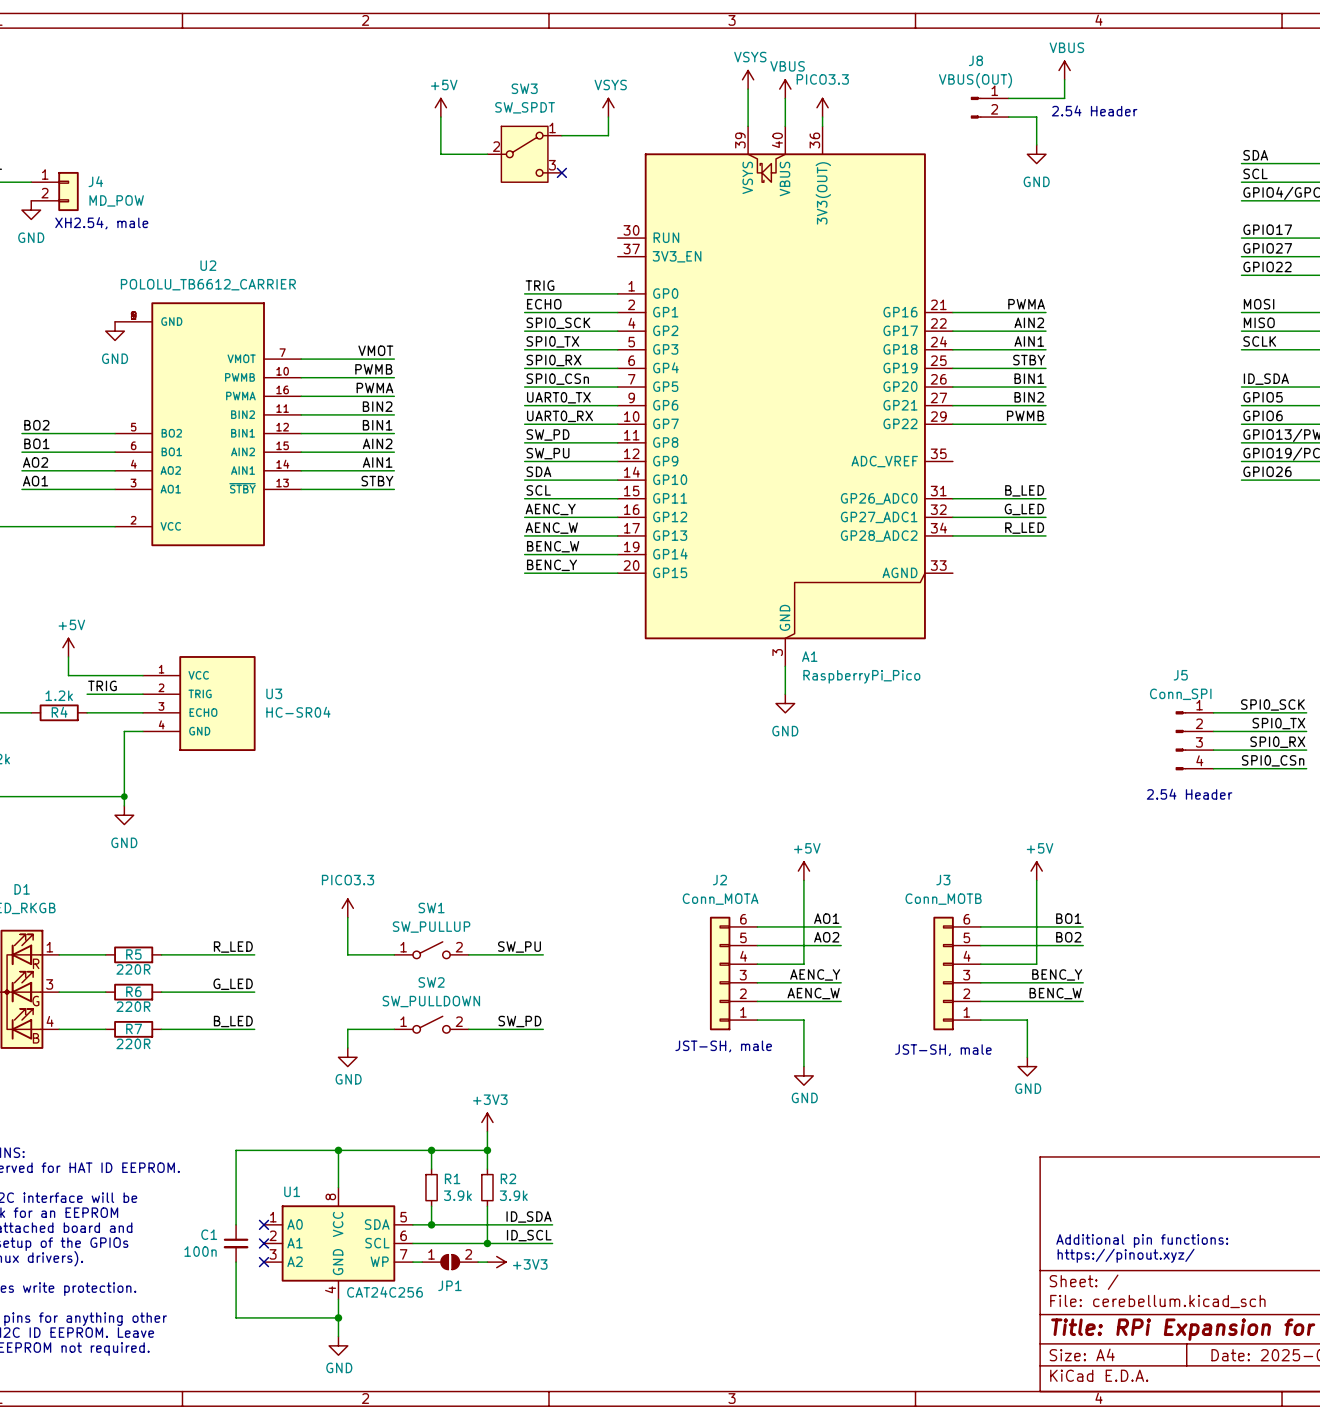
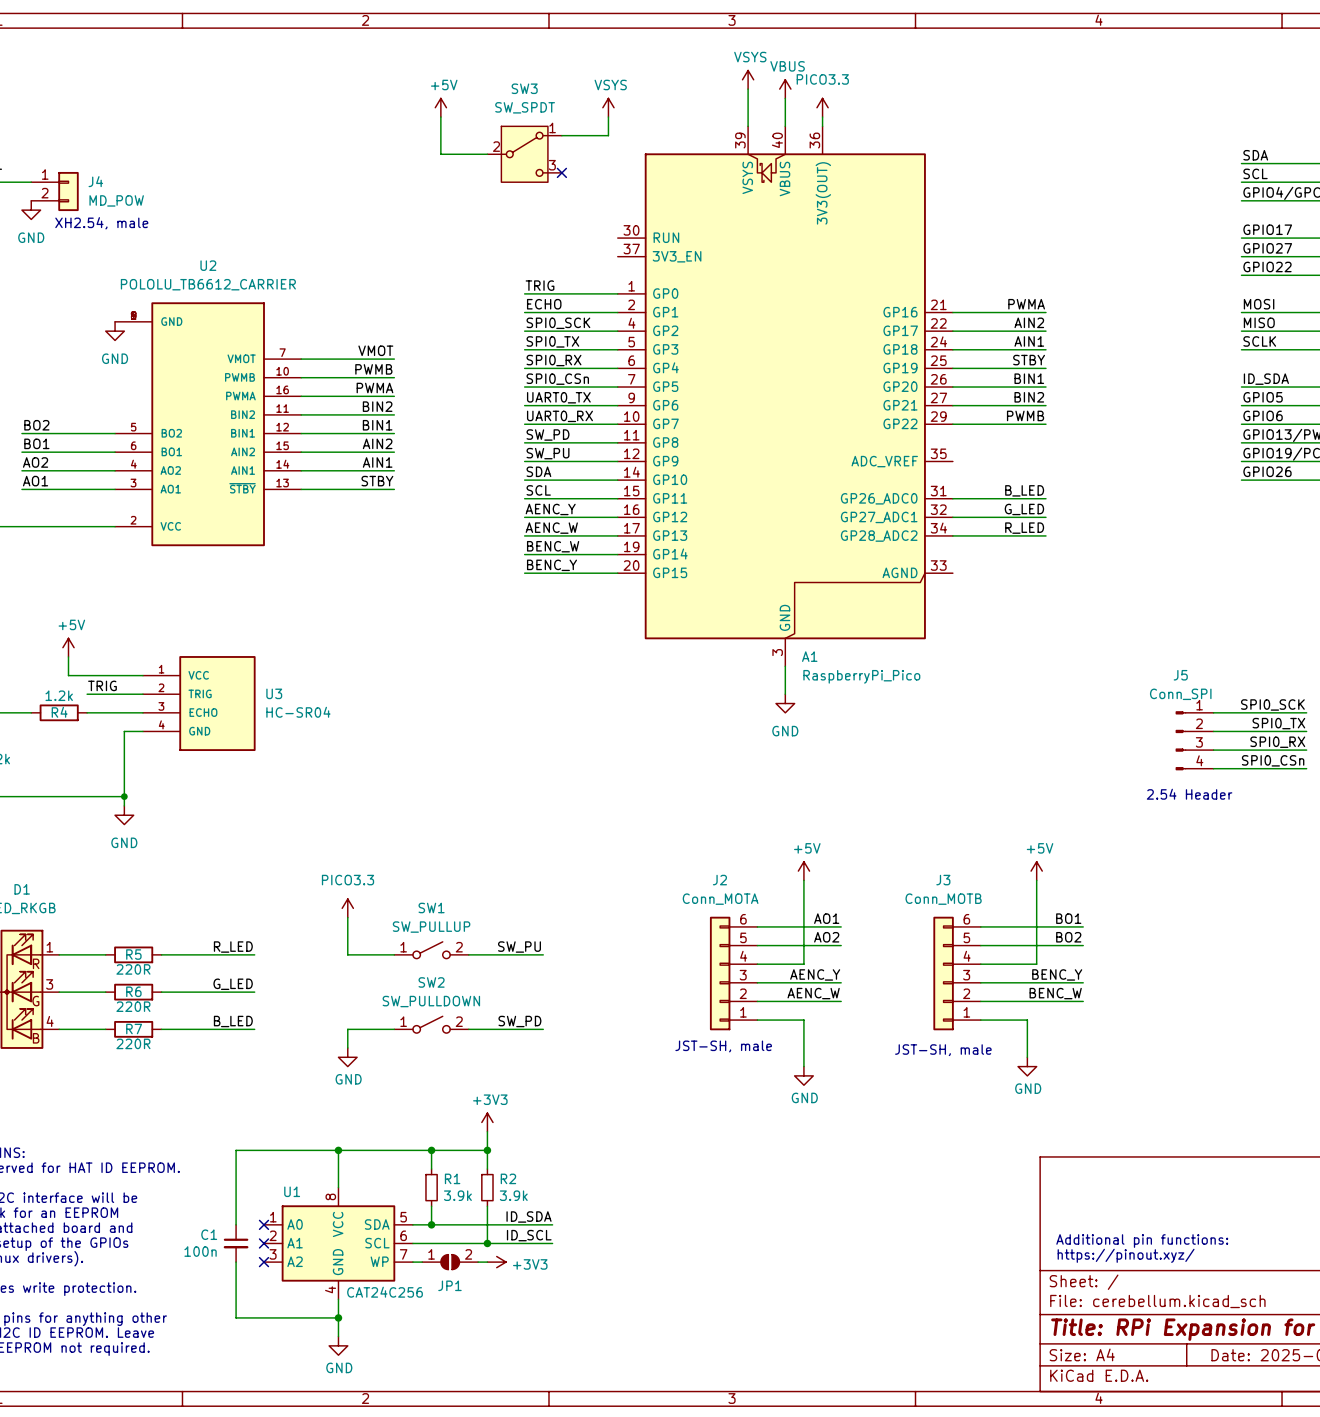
power symbol: VBUS (1064, 70) -> none
wire: (1064, 79) (1064, 98) (1008, 98) -> none
J8: VBUS(OUT) (989, 107) -> none
text: 2.54 Header (1094, 110) -> none
wire: (1008, 117) (1036, 117) (1036, 144) -> none
power symbol: GND (1036, 154) -> none

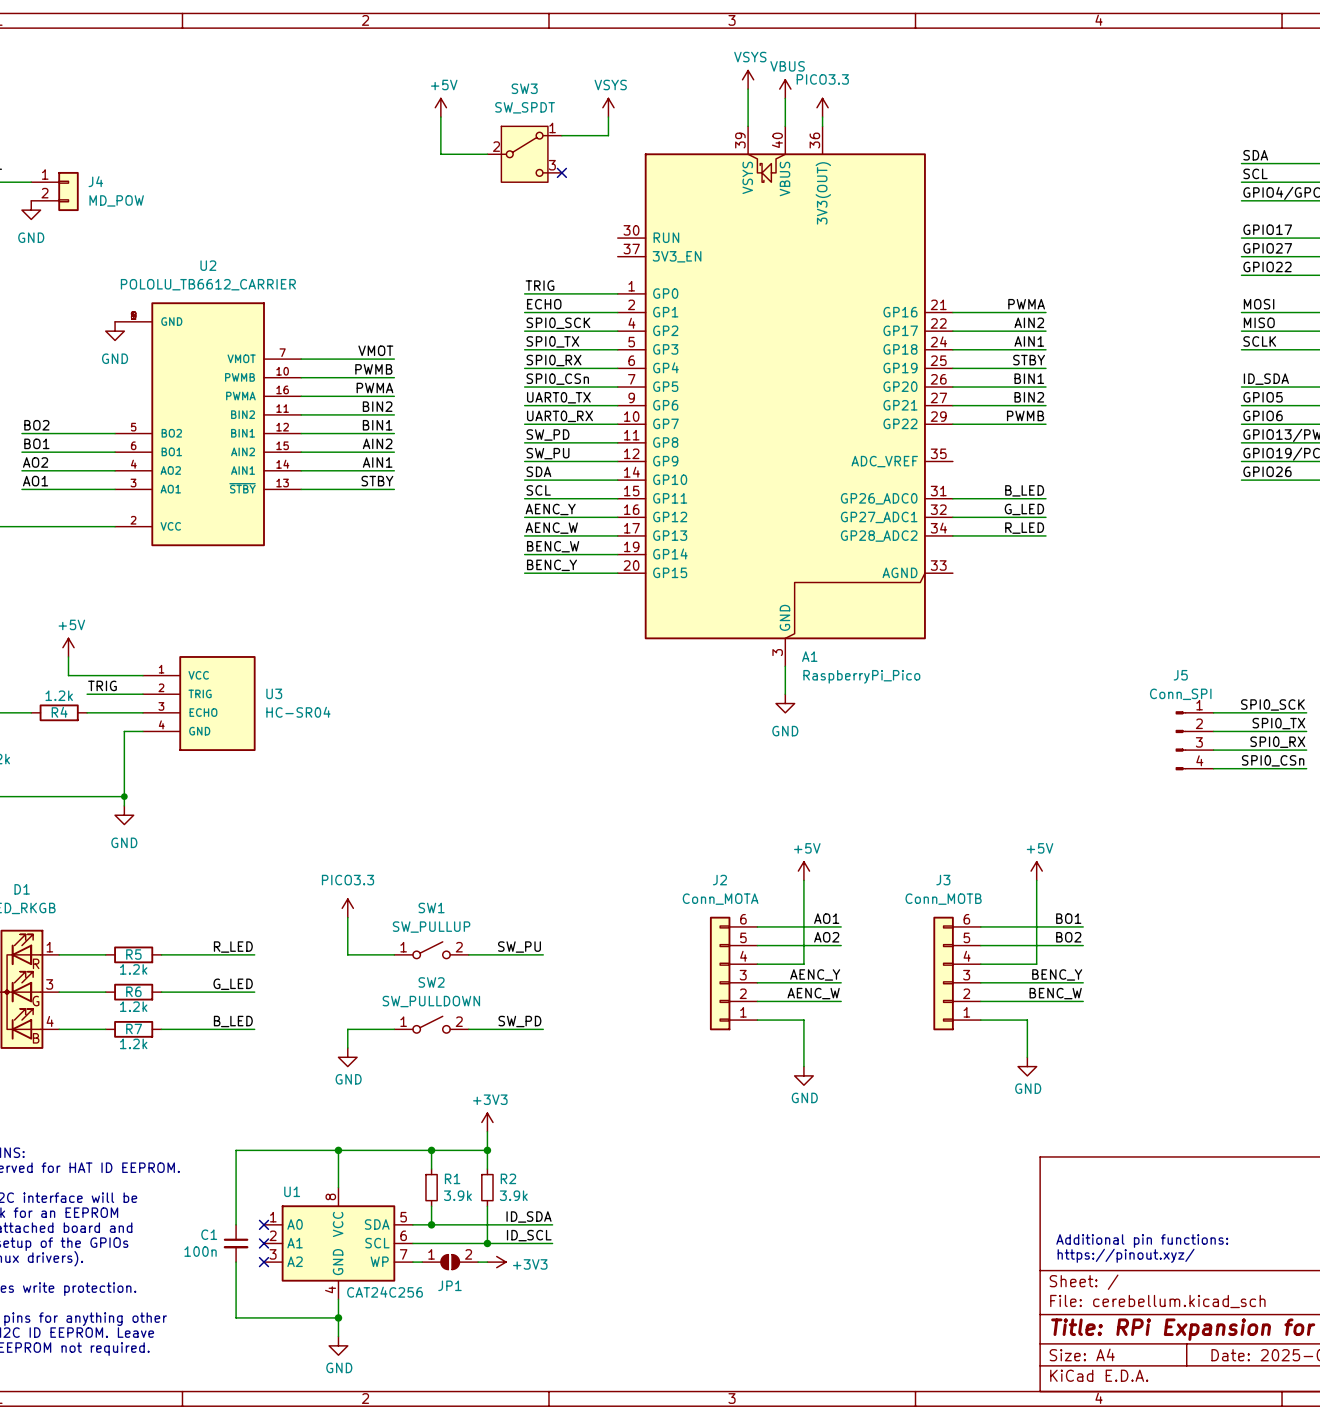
text: XH2.54, male (101, 223) -> none
text: 2.54 Header (1189, 794) -> none
R5 value: 220R (133, 969) -> 1.2k (133, 969)
R6 value: 220R (133, 1006) -> 1.2k (133, 1006)
R7 value: 220R (133, 1043) -> 1.2k (133, 1043)
text: JST-SH, male (723, 1046) -> none
text: JST-SH, male (943, 1050) -> none

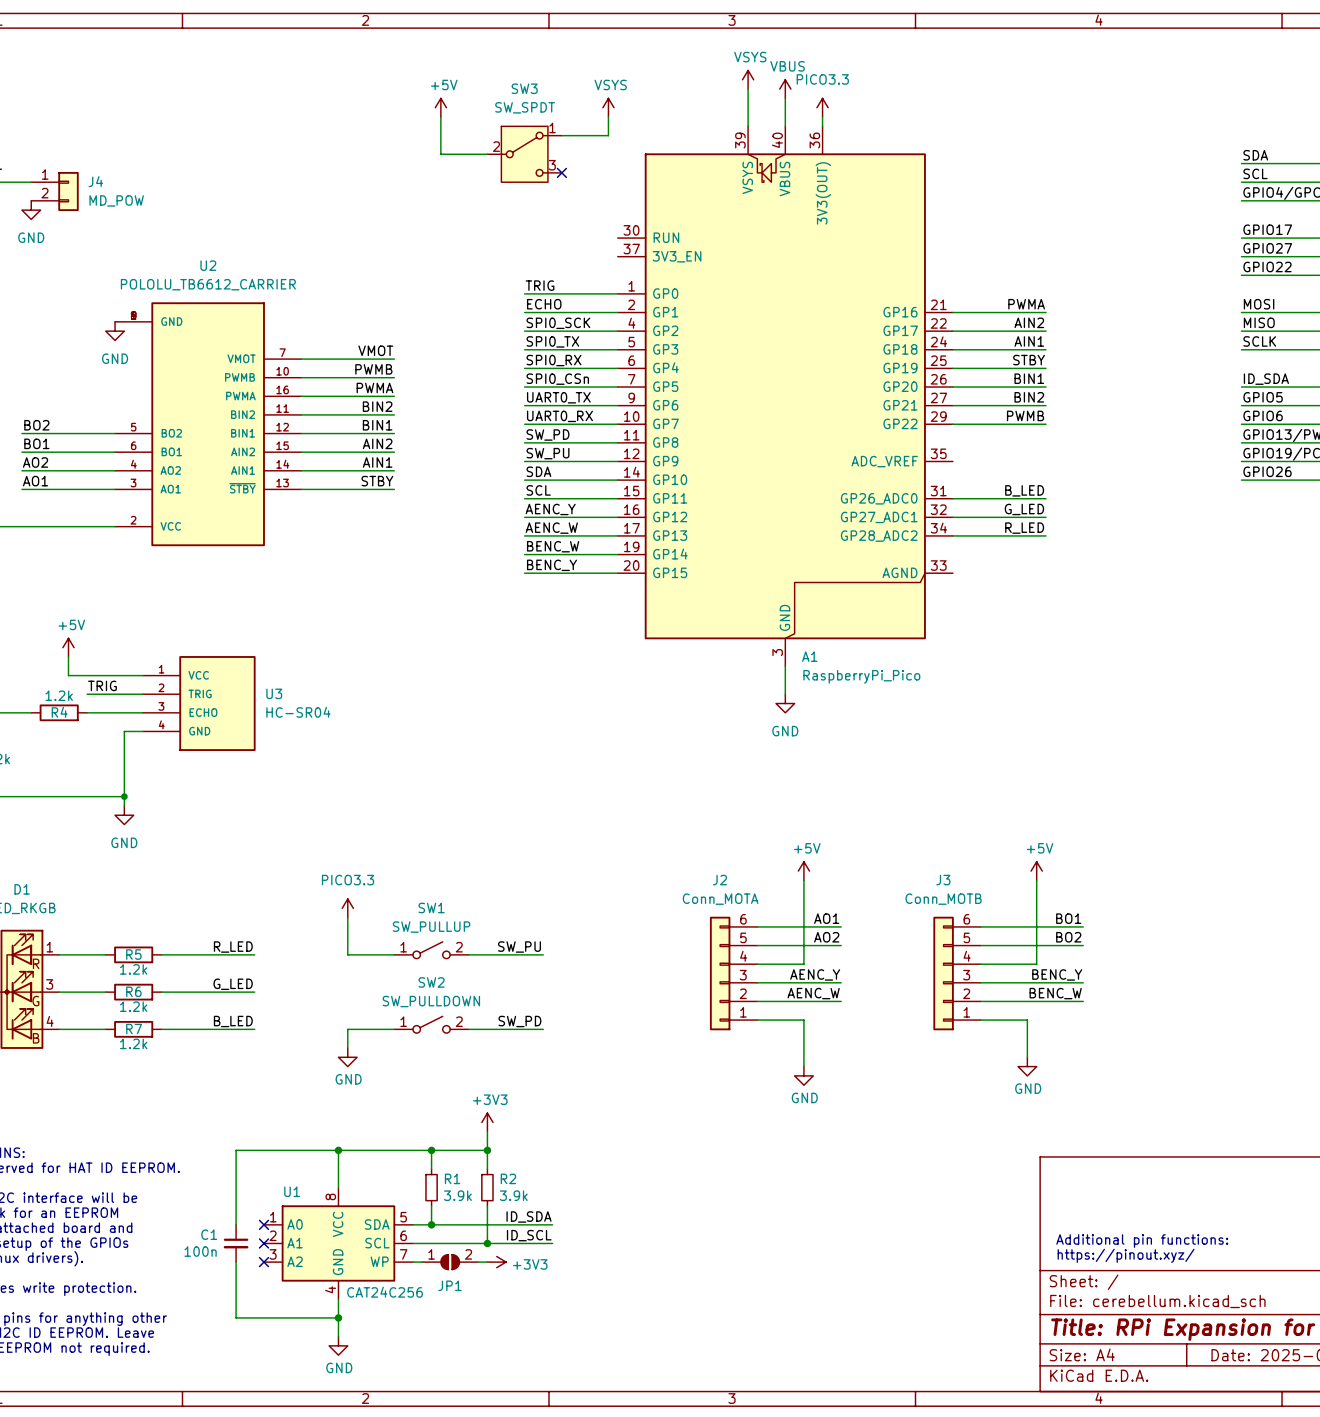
label: SPI0_SCK (1272, 704) -> none
wire: (1213, 712) (1306, 712) -> none
label: SPI0_TX (1278, 723) -> none
wire: (1213, 731) (1306, 731) -> none
J5: Conn_SPI (1194, 740) -> none
label: SPI0_RX (1277, 742) -> none
wire: (1213, 750) (1306, 750) -> none
label: SPI0_CSn (1273, 760) -> none
wire: (1213, 768) (1306, 768) -> none

